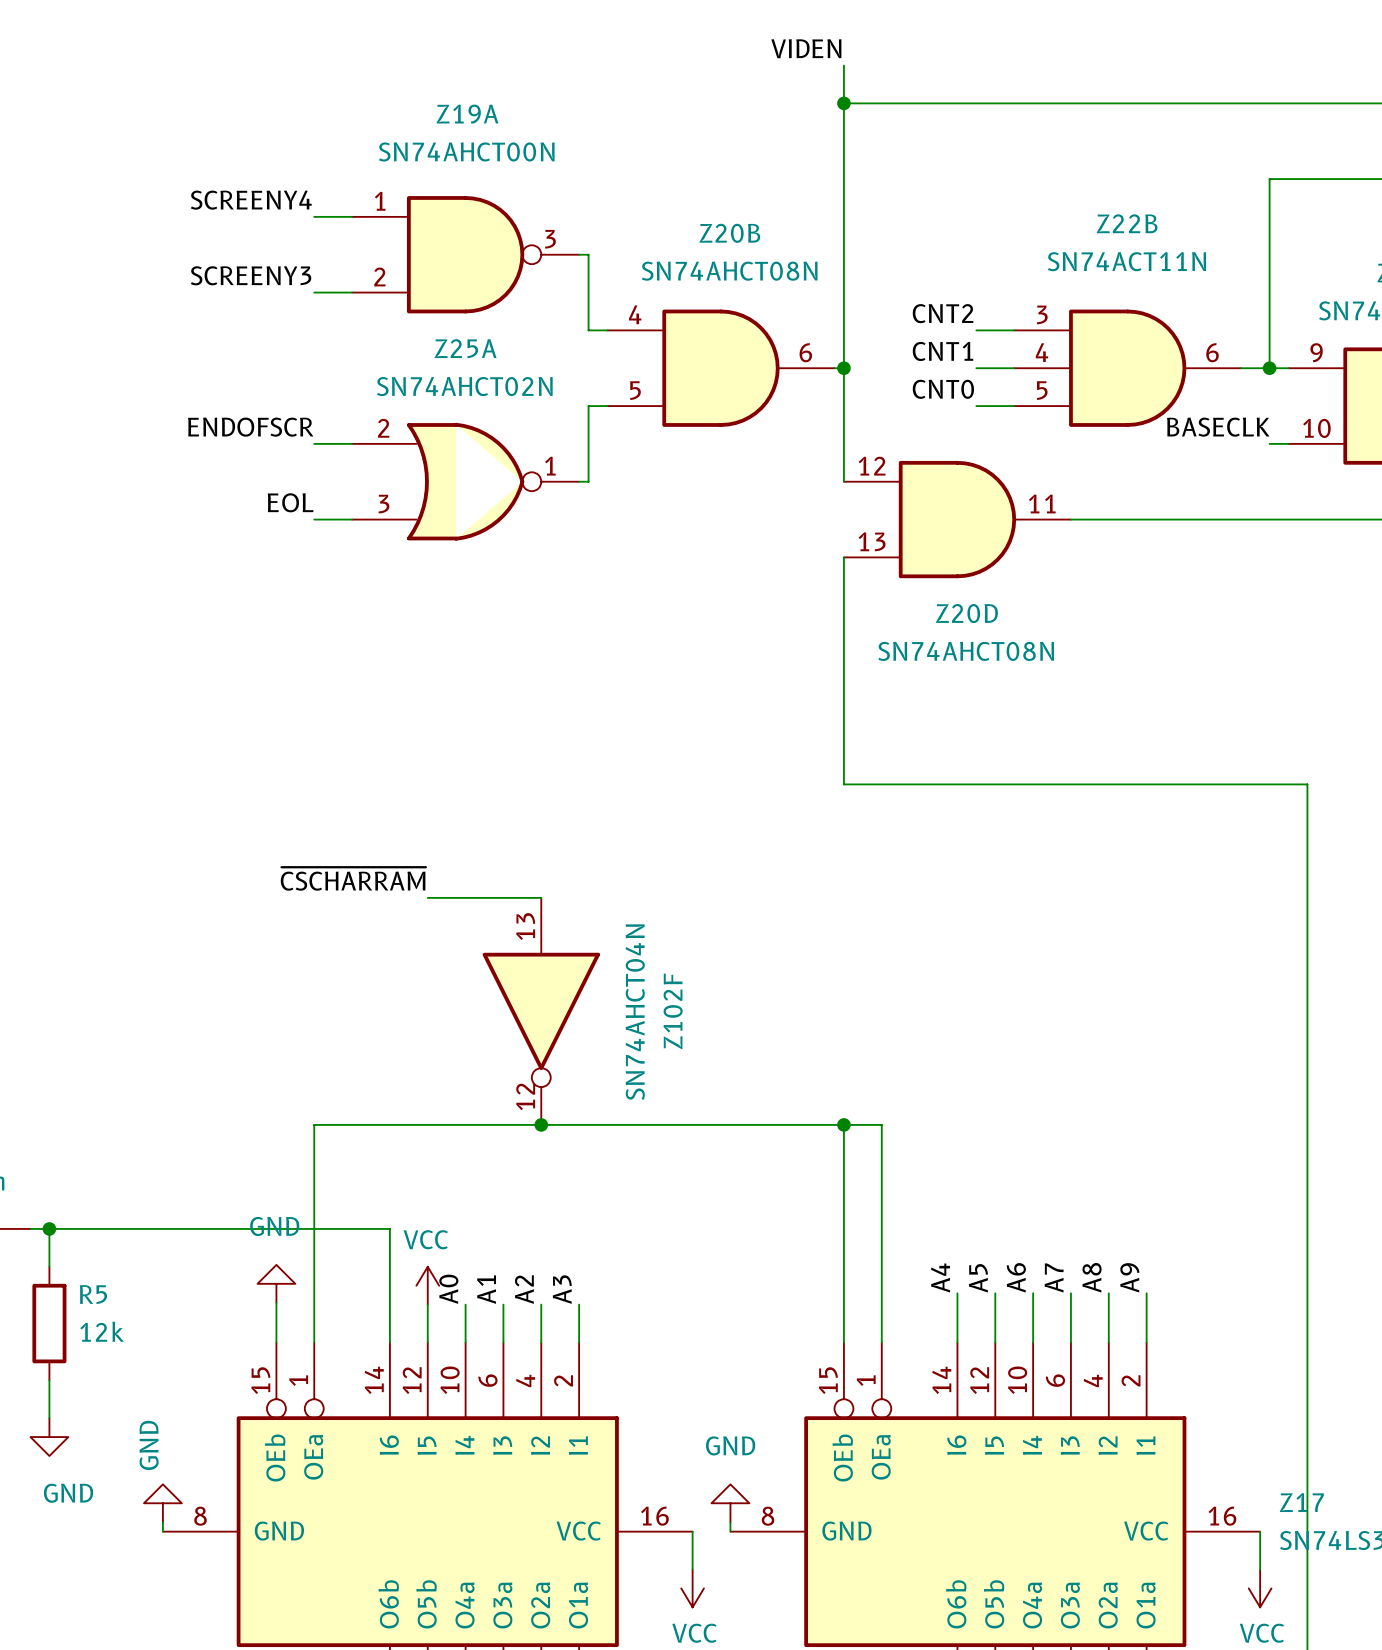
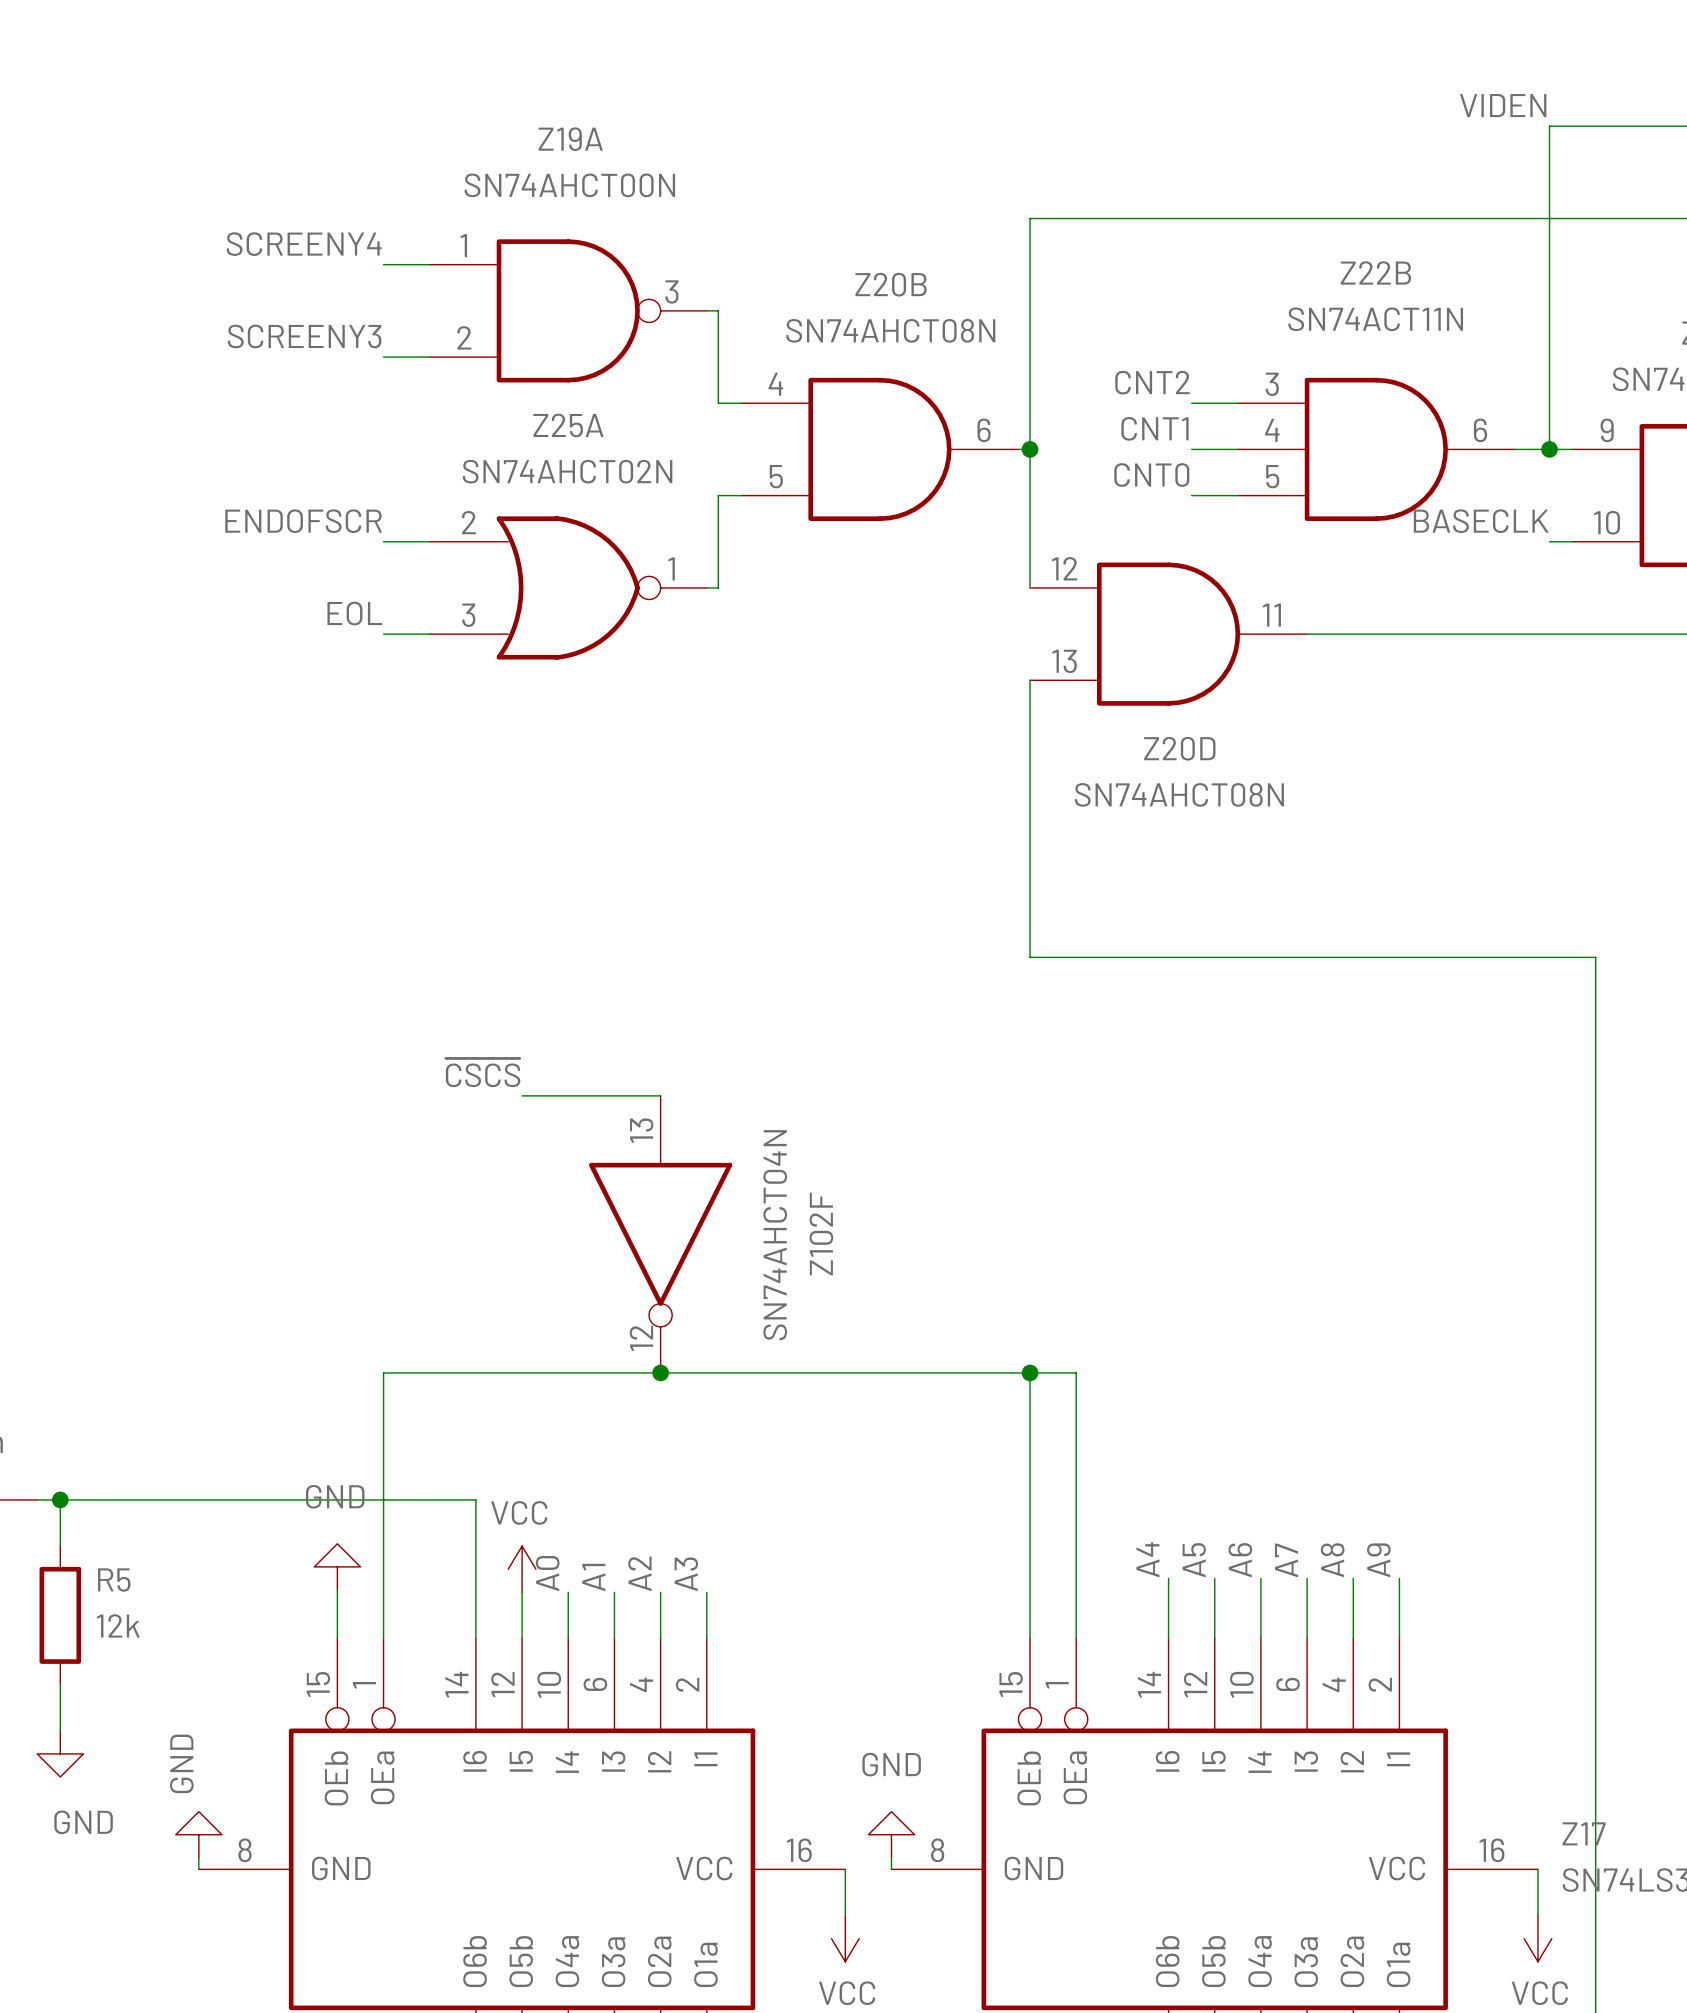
label: VIDEN (806, 48) -> none
wire: (843, 65) (843, 179) -> none
label: none -> VIDEN (1503, 105)
wire: (843, 103) (1269, 103) -> (1030, 218) (1549, 218) (1549, 126)
junction: (843, 103) -> none
label: ~{CSCHARRAM} (353, 878) -> ~{CSCS} (483, 1072)

